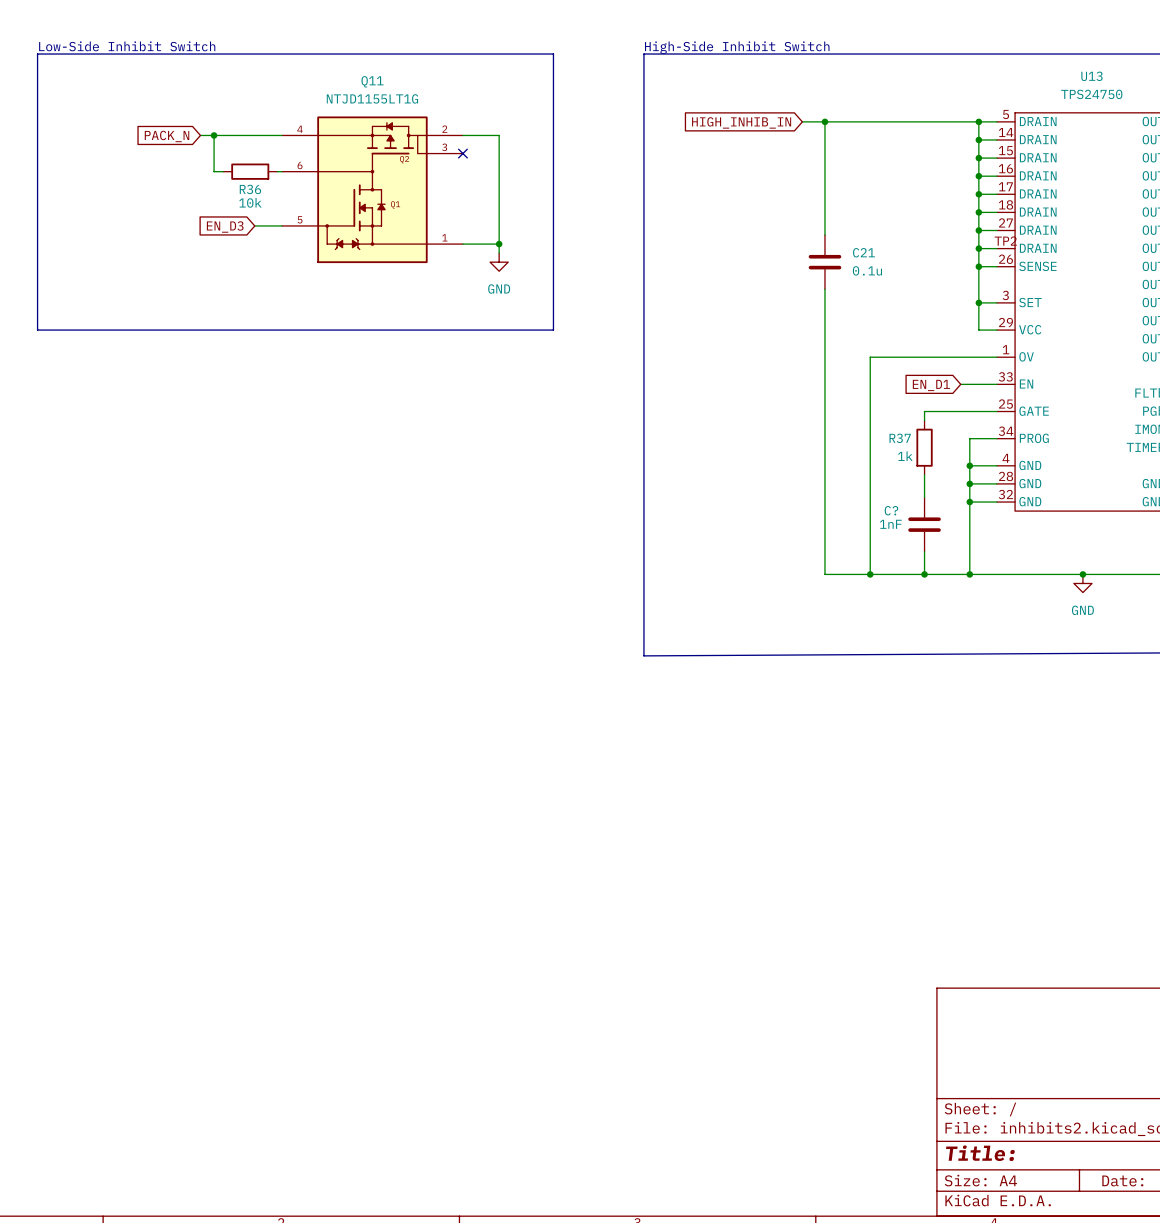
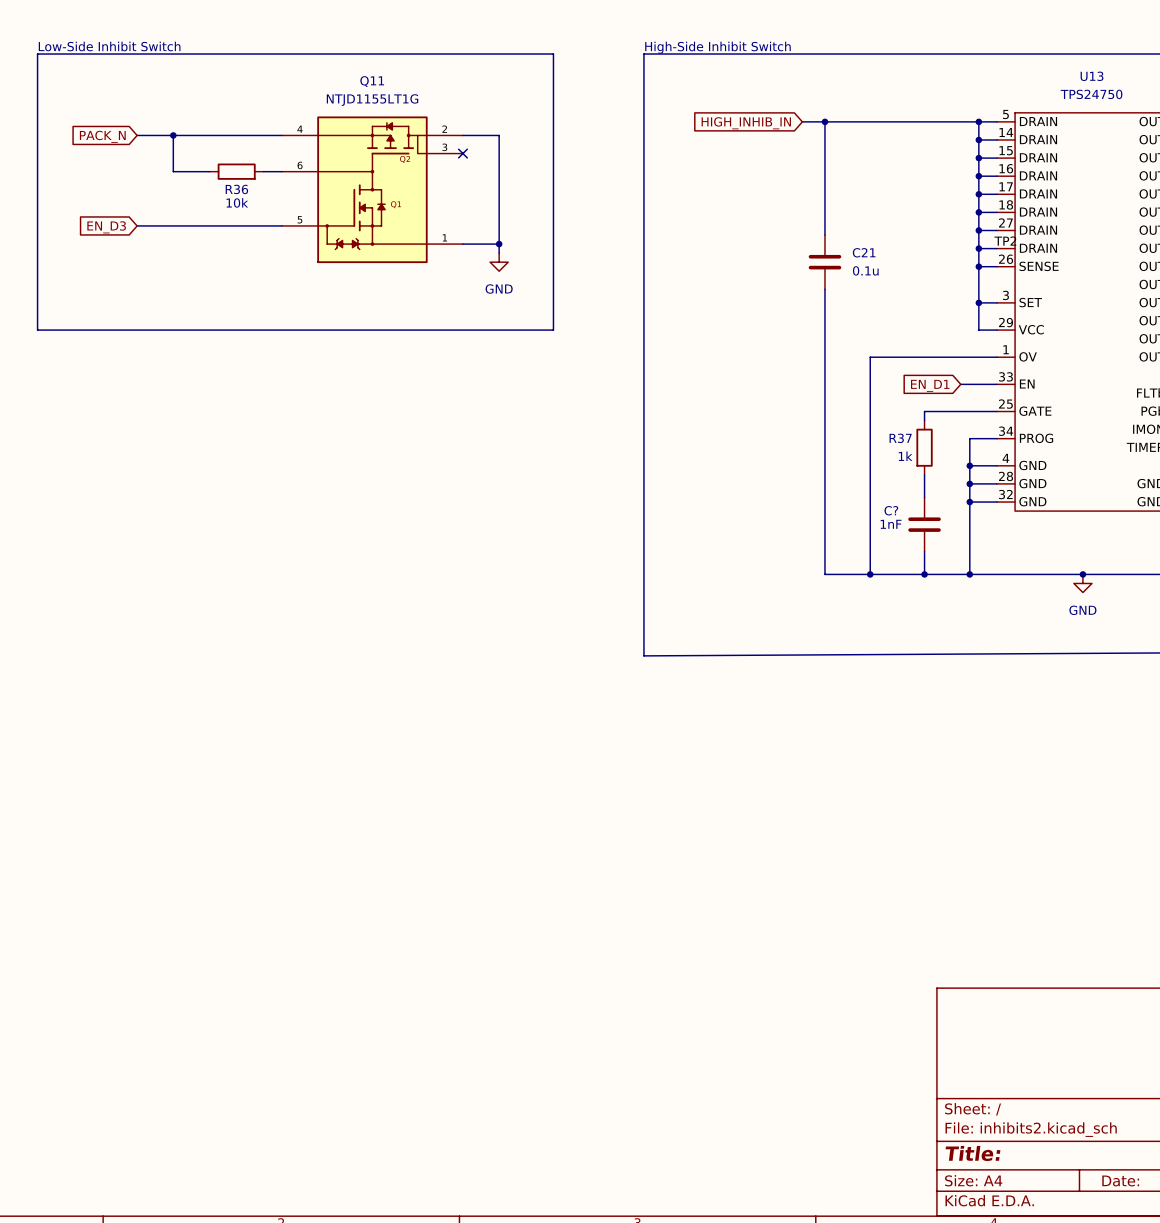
wire: none -> (137, 135) (200, 135)
wire: none -> (173, 135) (173, 171) (209, 171)
wire: (214, 135) (214, 171) (223, 171) -> none
junction position: (214, 135) -> (173, 135)
global label position: PACK_N (167, 136) -> PACK_N (102, 136)
R36 position: (250, 171) -> (236, 171)
wire: none -> (137, 225) (254, 225)
global label position: EN_D3 (225, 226) -> EN_D3 (106, 227)

